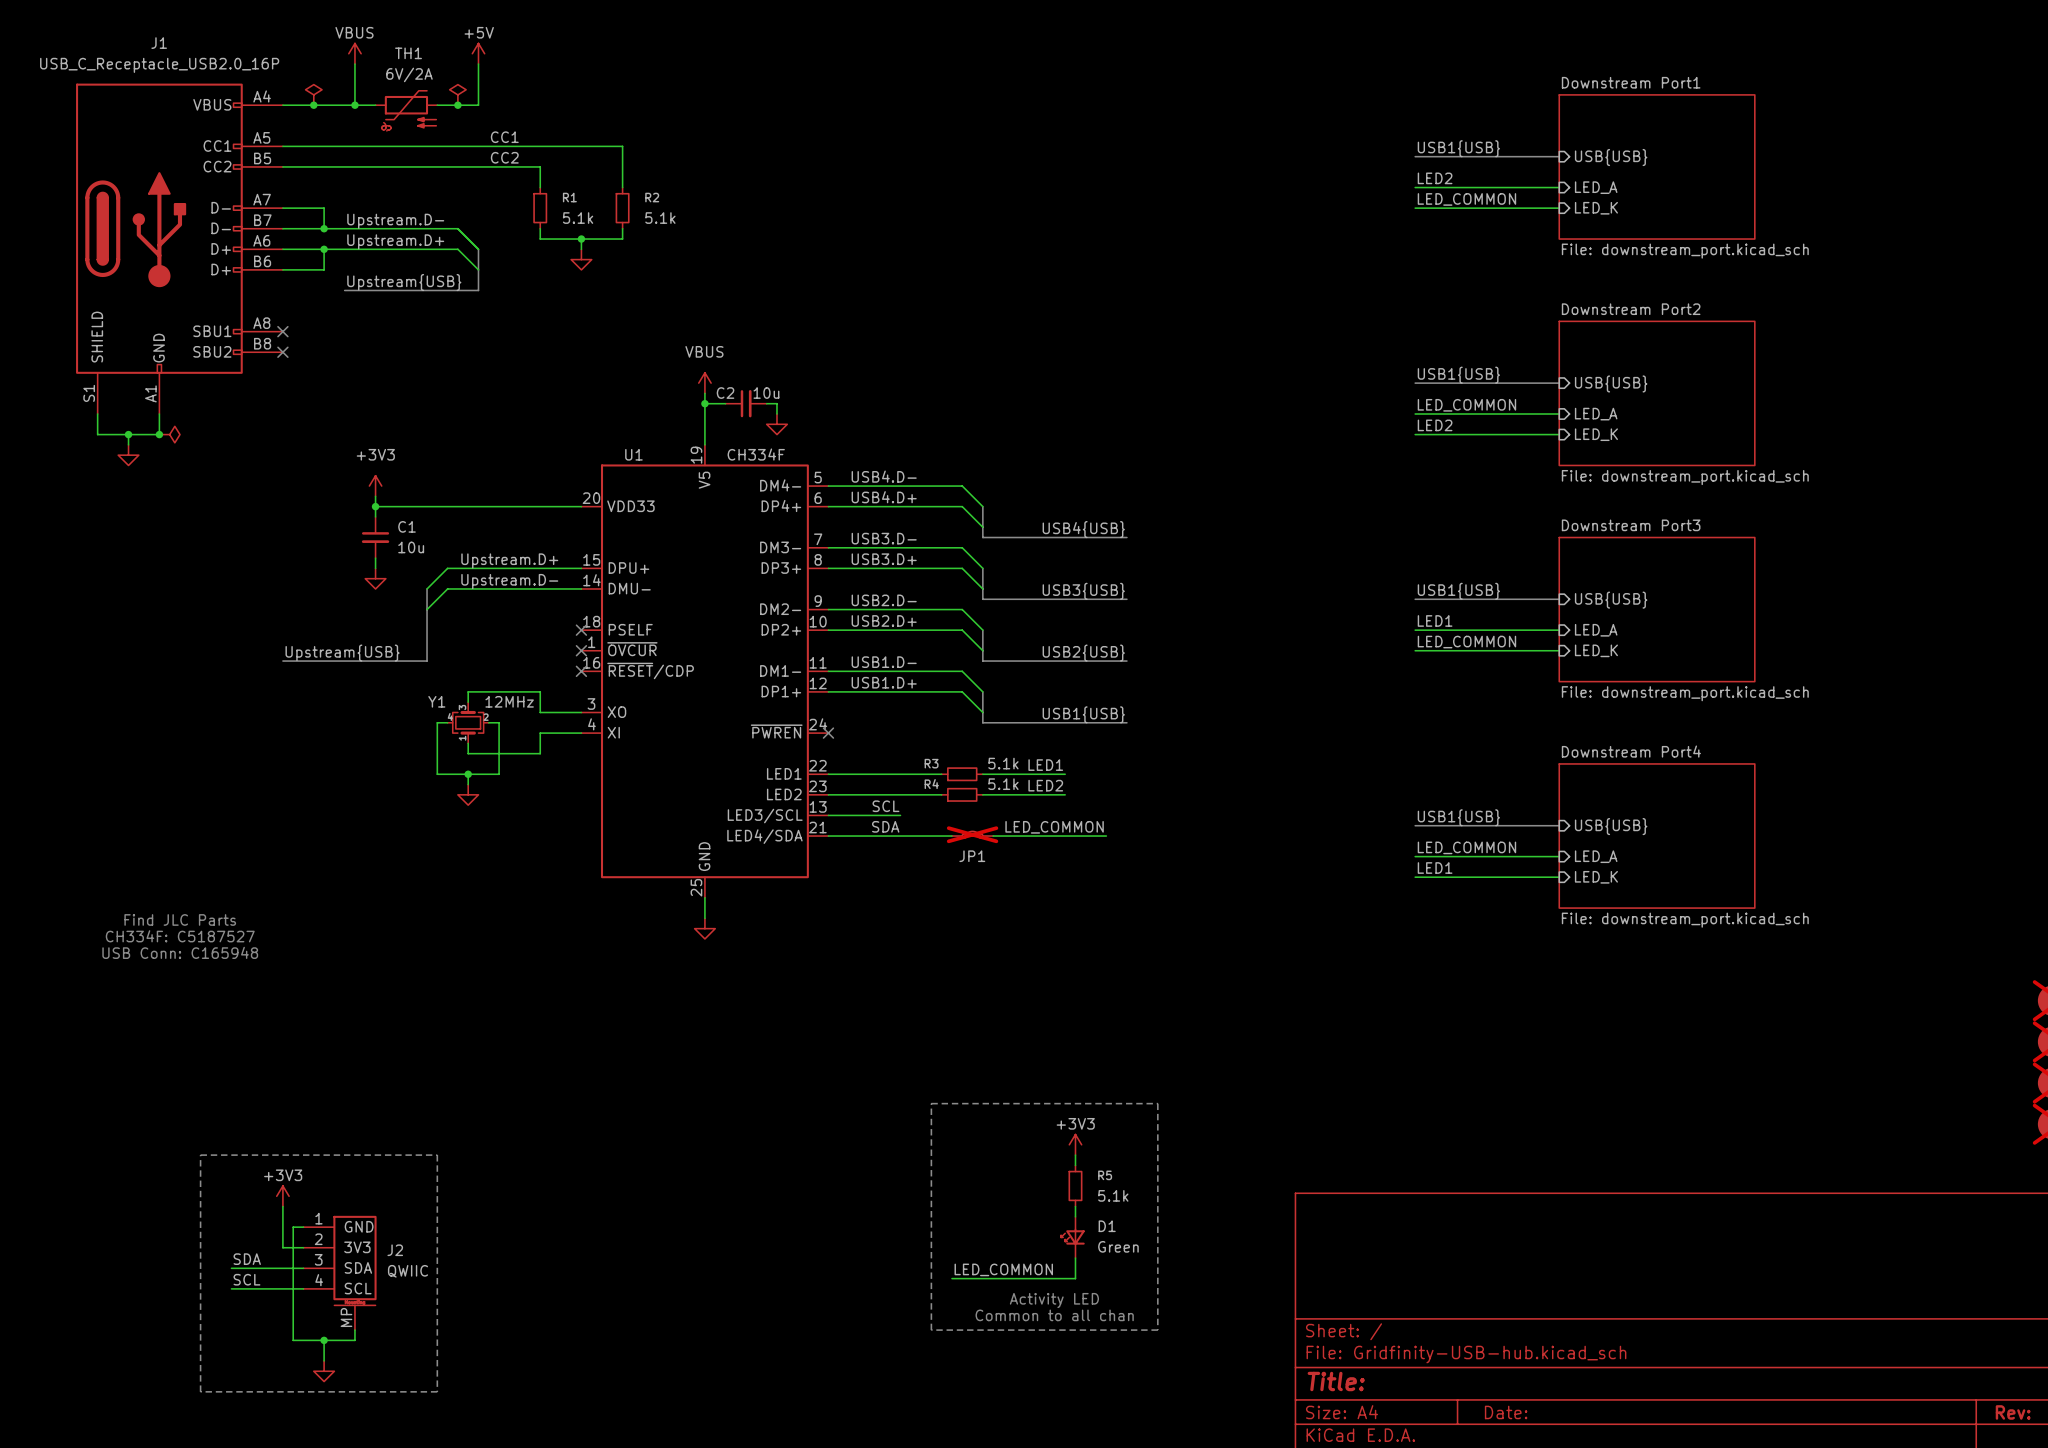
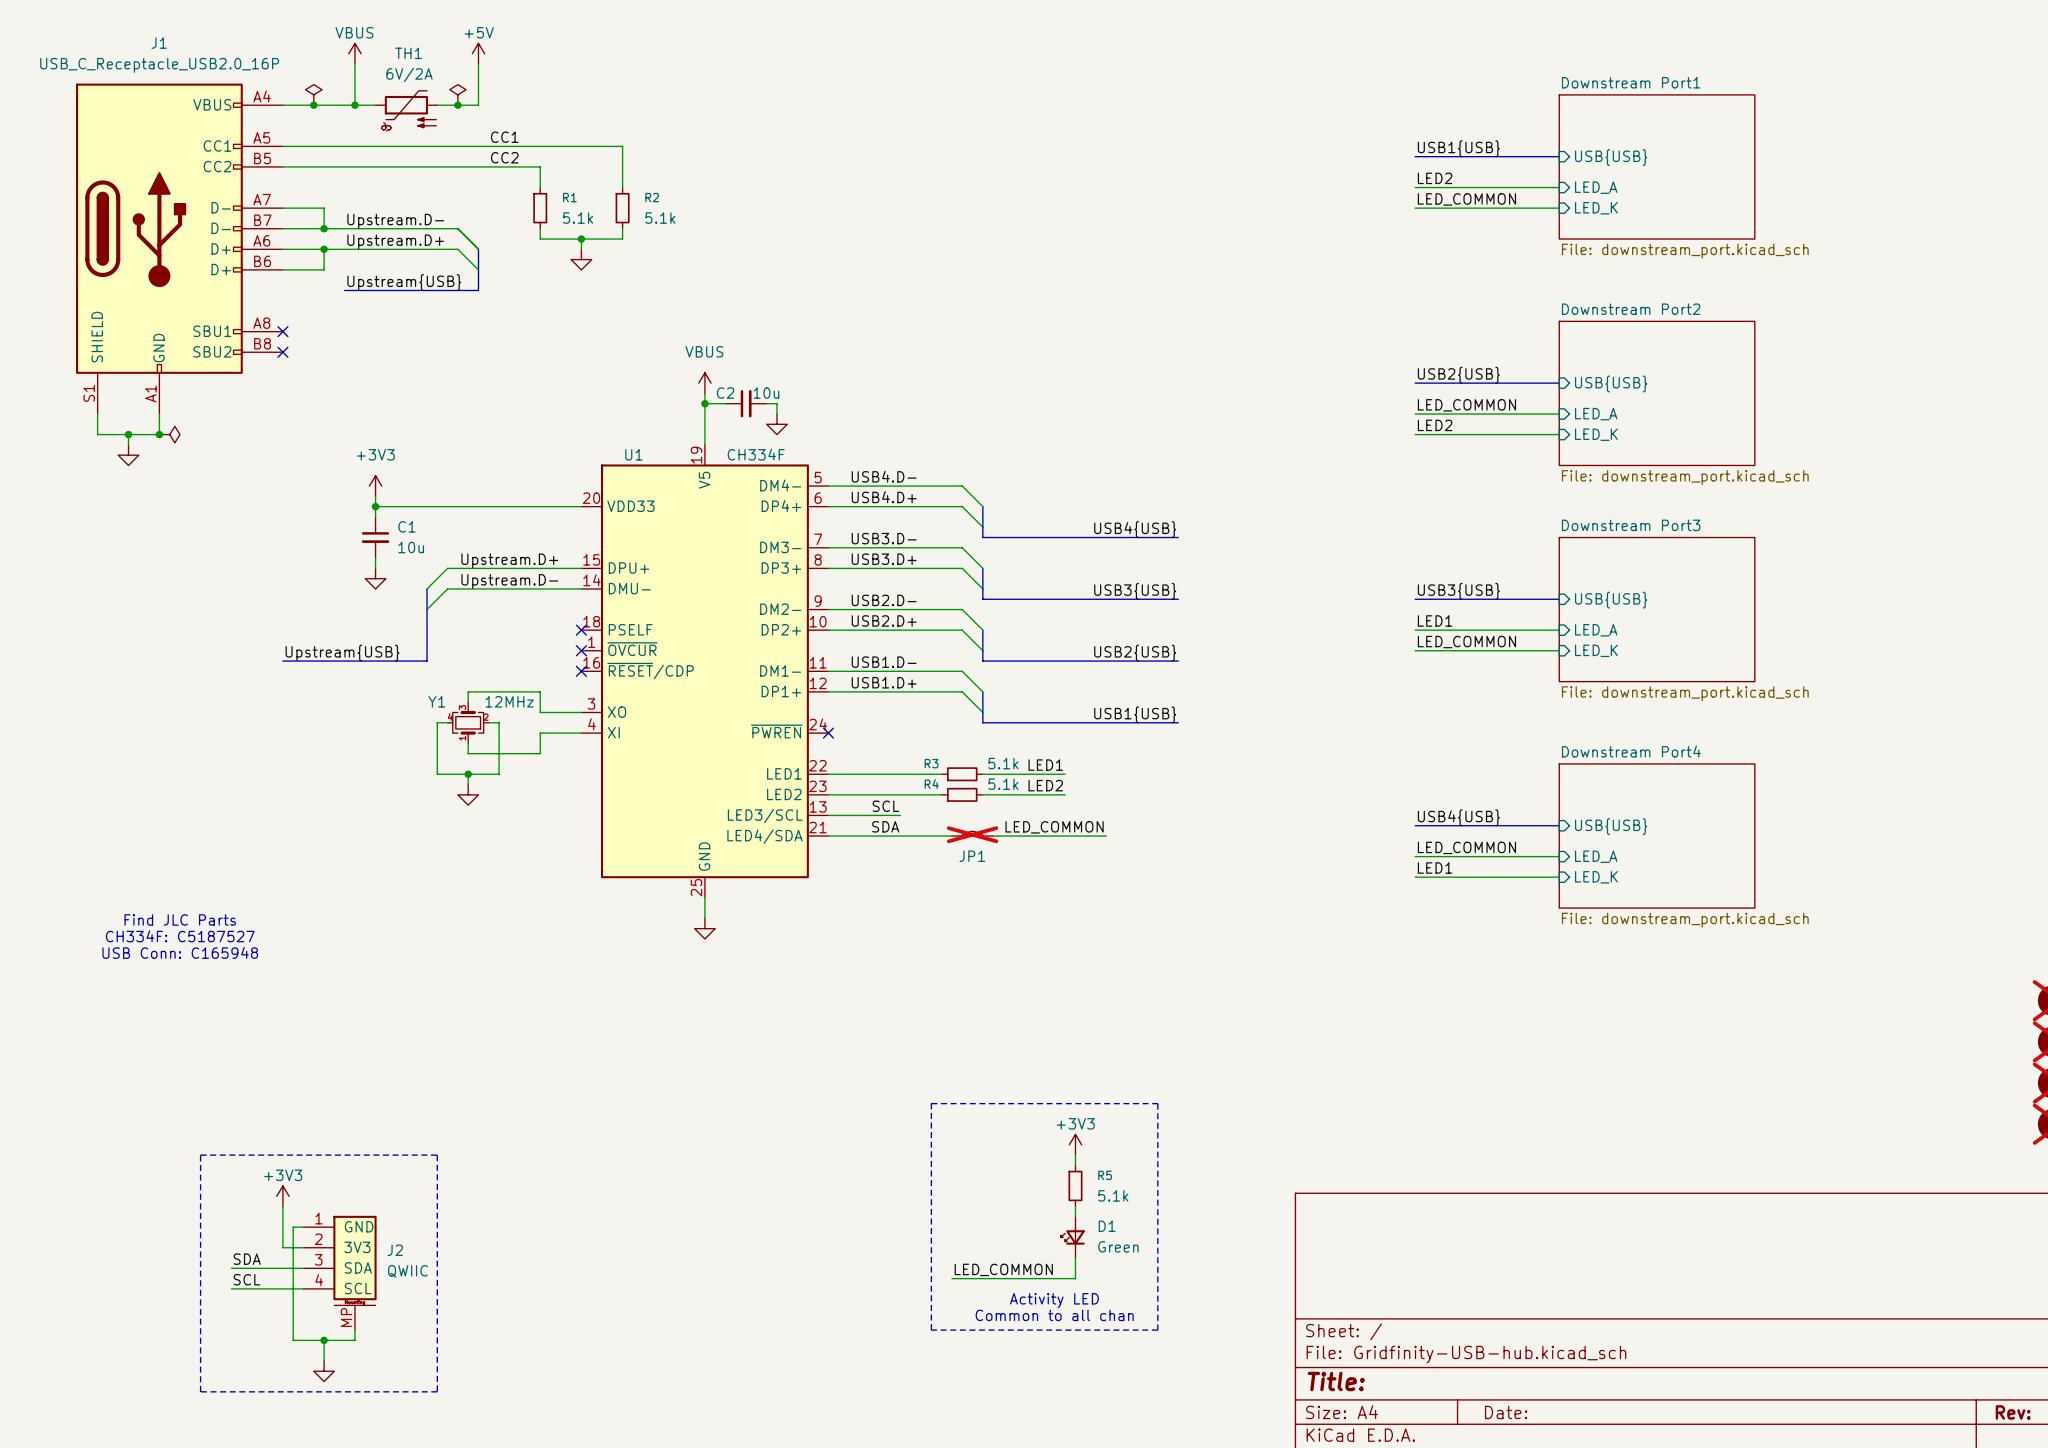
label: USB1{USB} (1458, 375) -> USB2{USB} (1458, 375)
label position: USB4{USB} (1083, 529) -> USB4{USB} (1135, 529)
bus: none -> (1126, 537) (1178, 537)
label position: USB3{USB} (1083, 591) -> USB3{USB} (1135, 591)
label: USB1{USB} (1458, 591) -> USB3{USB} (1458, 591)
bus: none -> (1126, 599) (1178, 599)
label position: USB2{USB} (1083, 653) -> USB2{USB} (1135, 653)
bus: none -> (1126, 661) (1178, 661)
label position: USB1{USB} (1083, 714) -> USB1{USB} (1135, 714)
bus: none -> (1126, 722) (1178, 722)
label: USB1{USB} (1458, 817) -> USB4{USB} (1458, 817)

